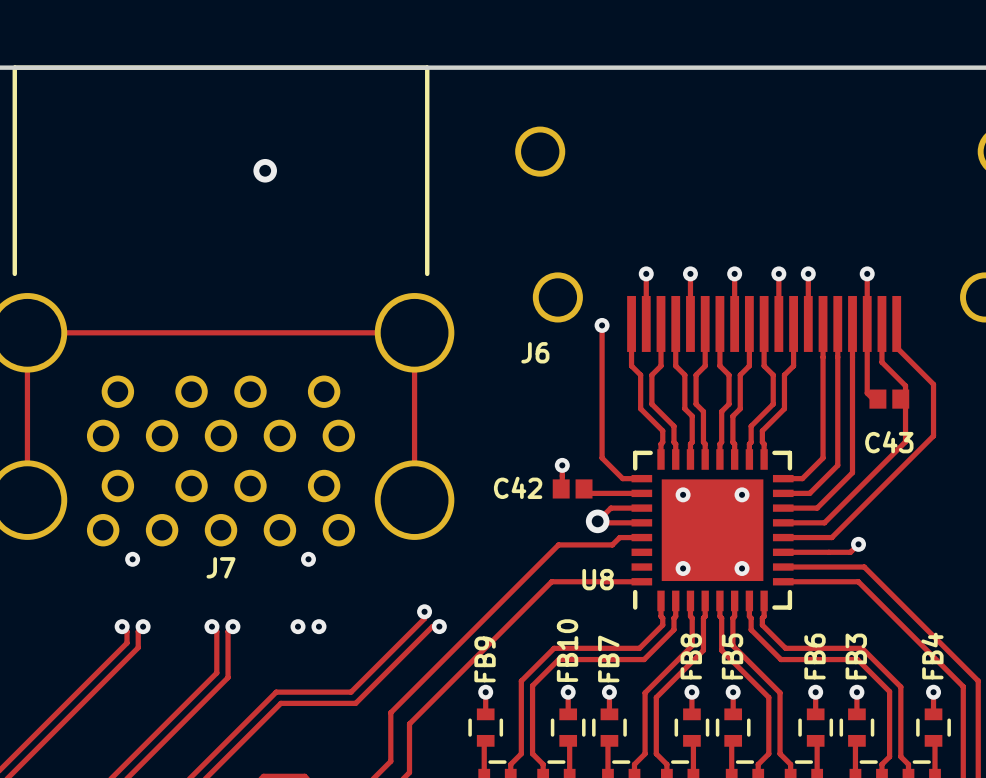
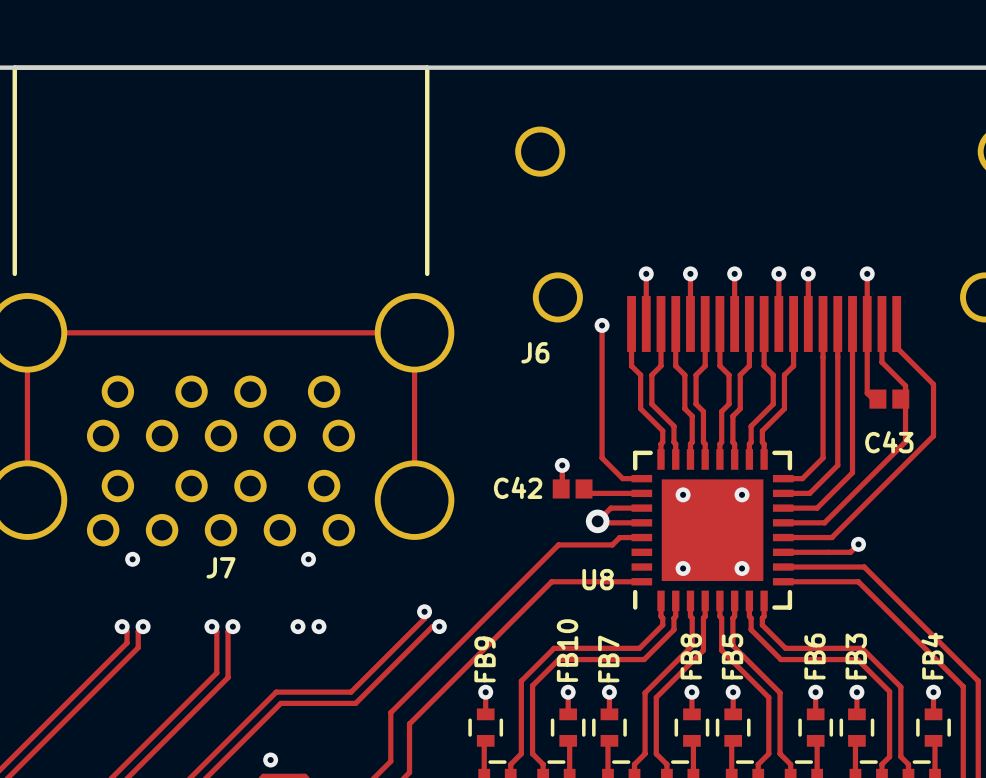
via: (265, 170) -> none
via: none -> (270, 760)

